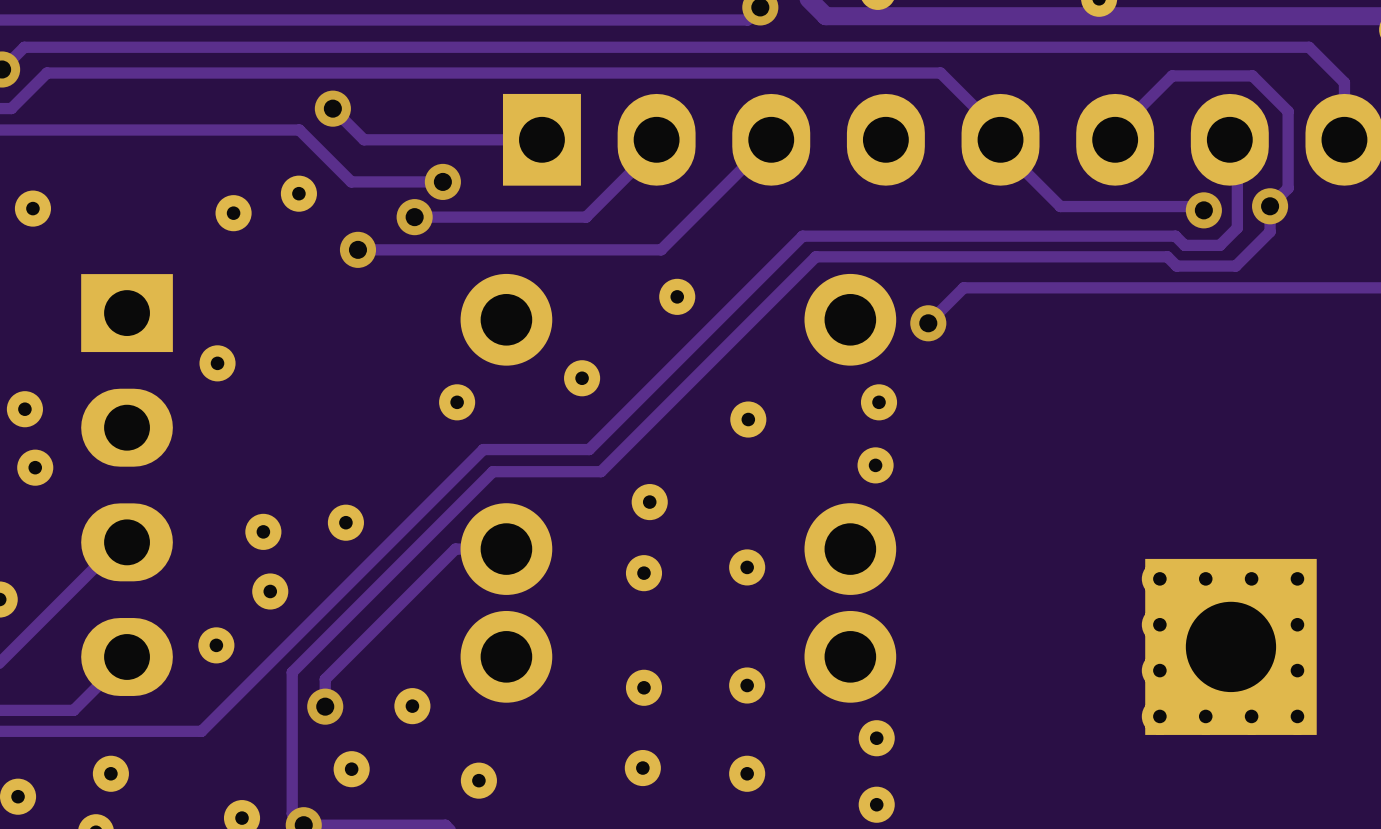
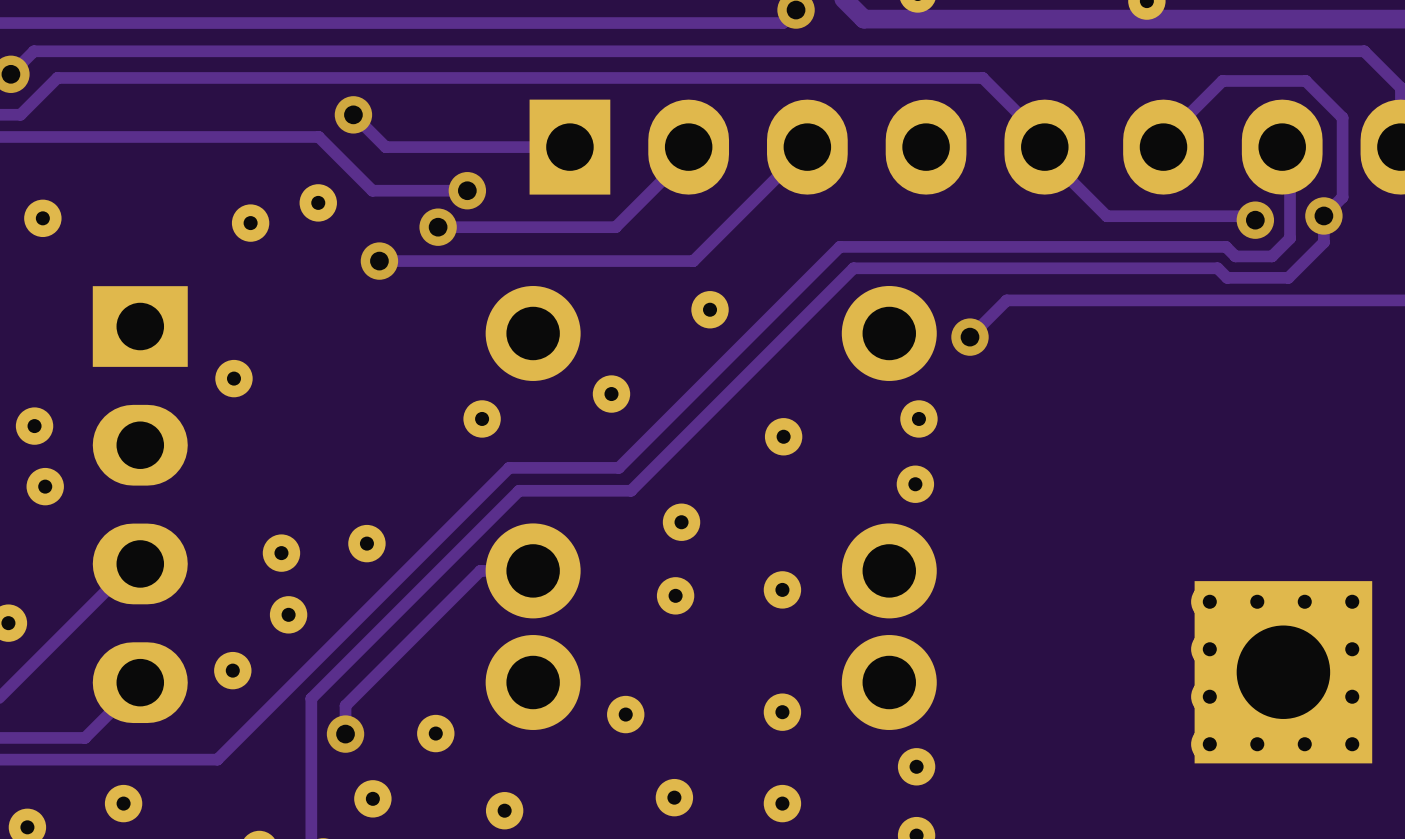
part position: (643, 687) -> (625, 714)

